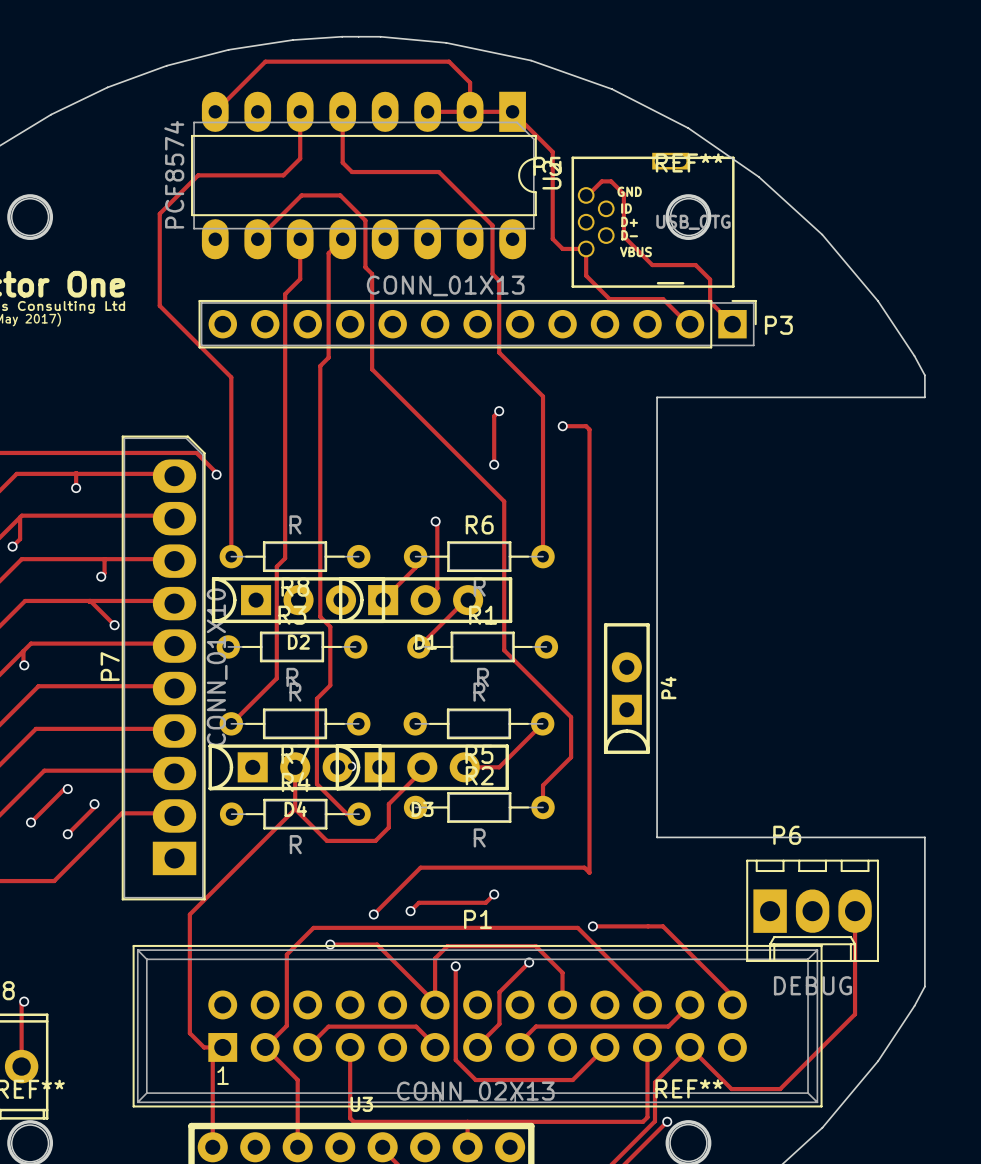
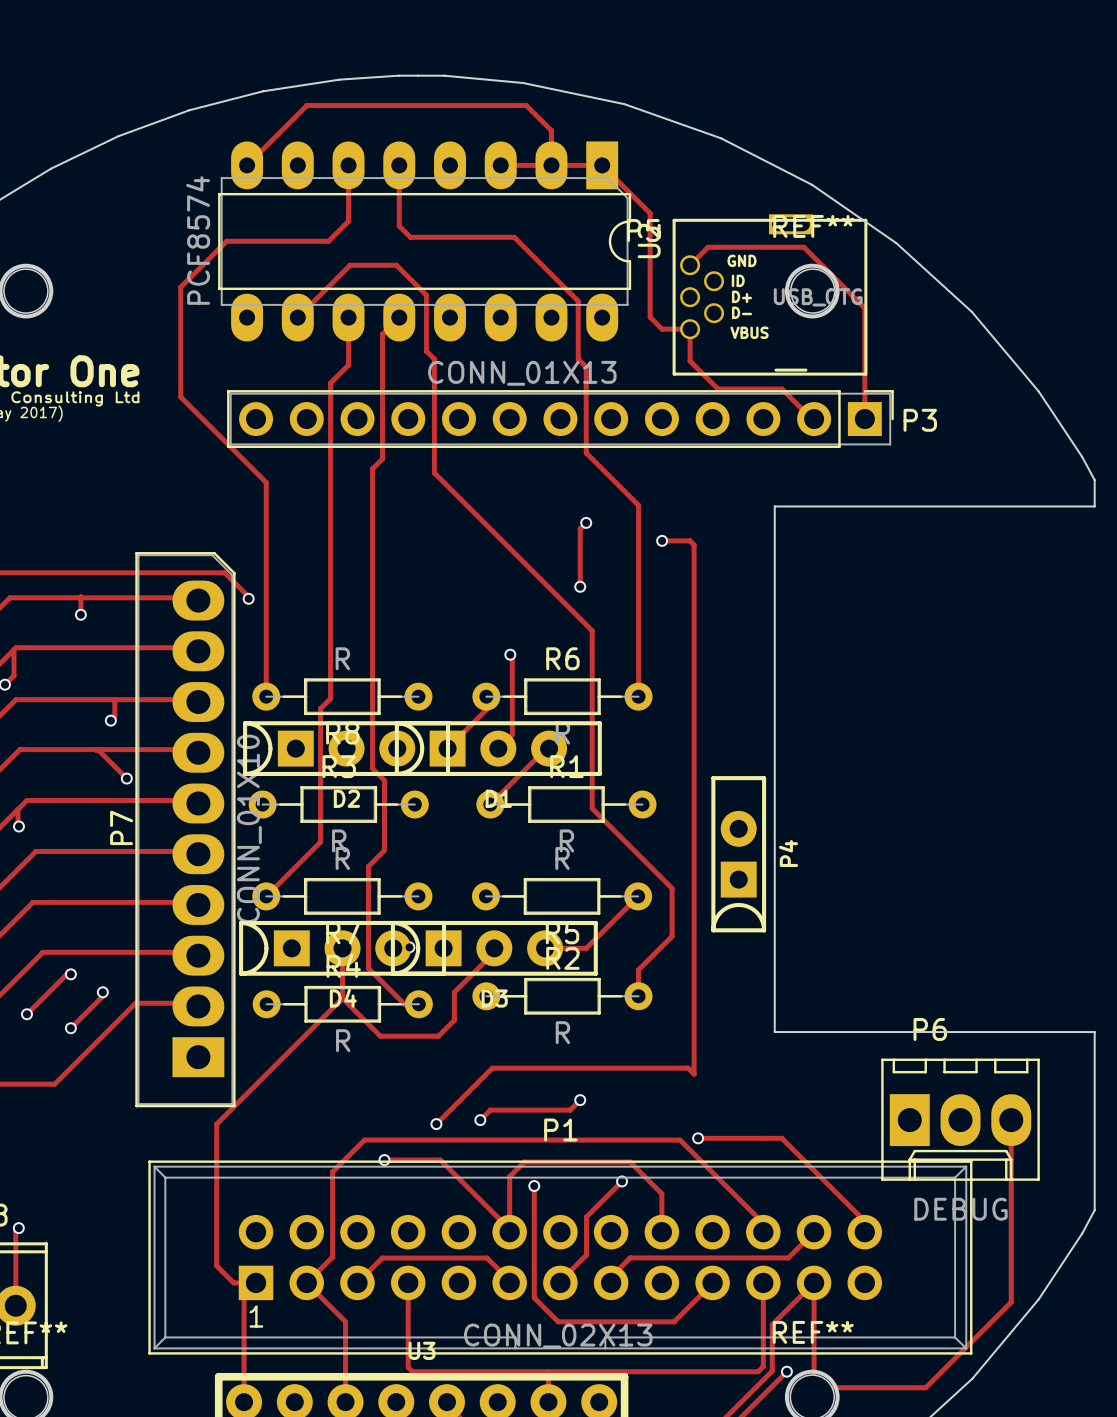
track: (586, 195) (601, 181) (611, 181) (623, 194) (623, 236) (652, 265) (695, 265) (710, 279) (710, 301) (732, 324) -> (690, 265) (708, 247) (803, 247) (864, 308) (864, 419)
track: (855, 1014) (780, 1089) (731, 1089) (689, 1047) -> (1011, 1243) (1011, 1302) (925, 1387) (809, 1387)
track: none -> (814, 1282) (814, 1383)

